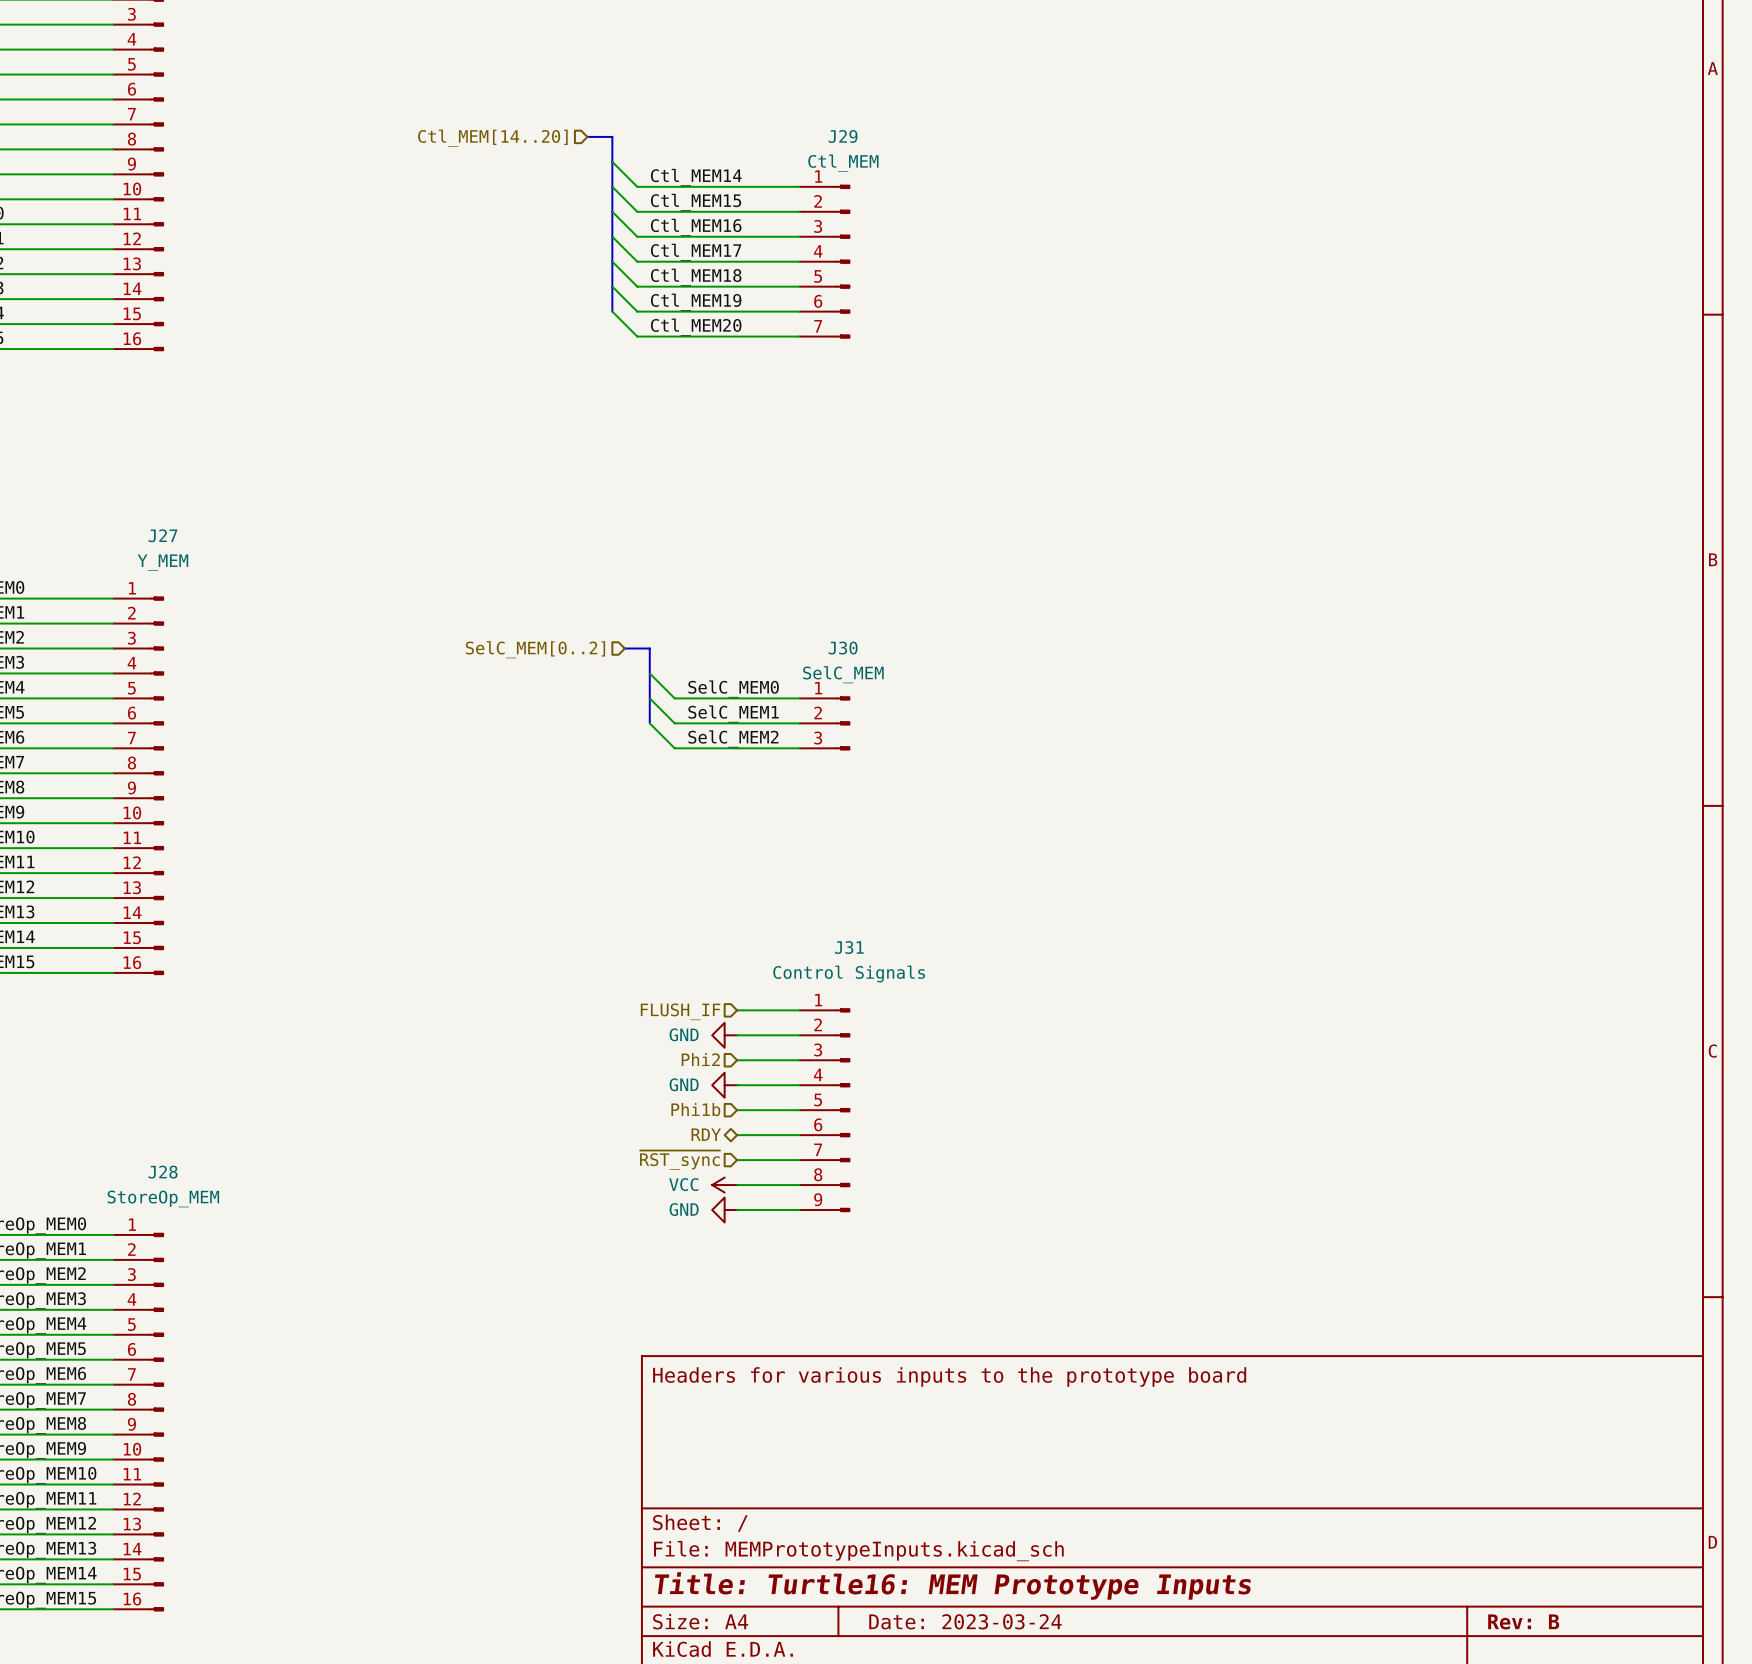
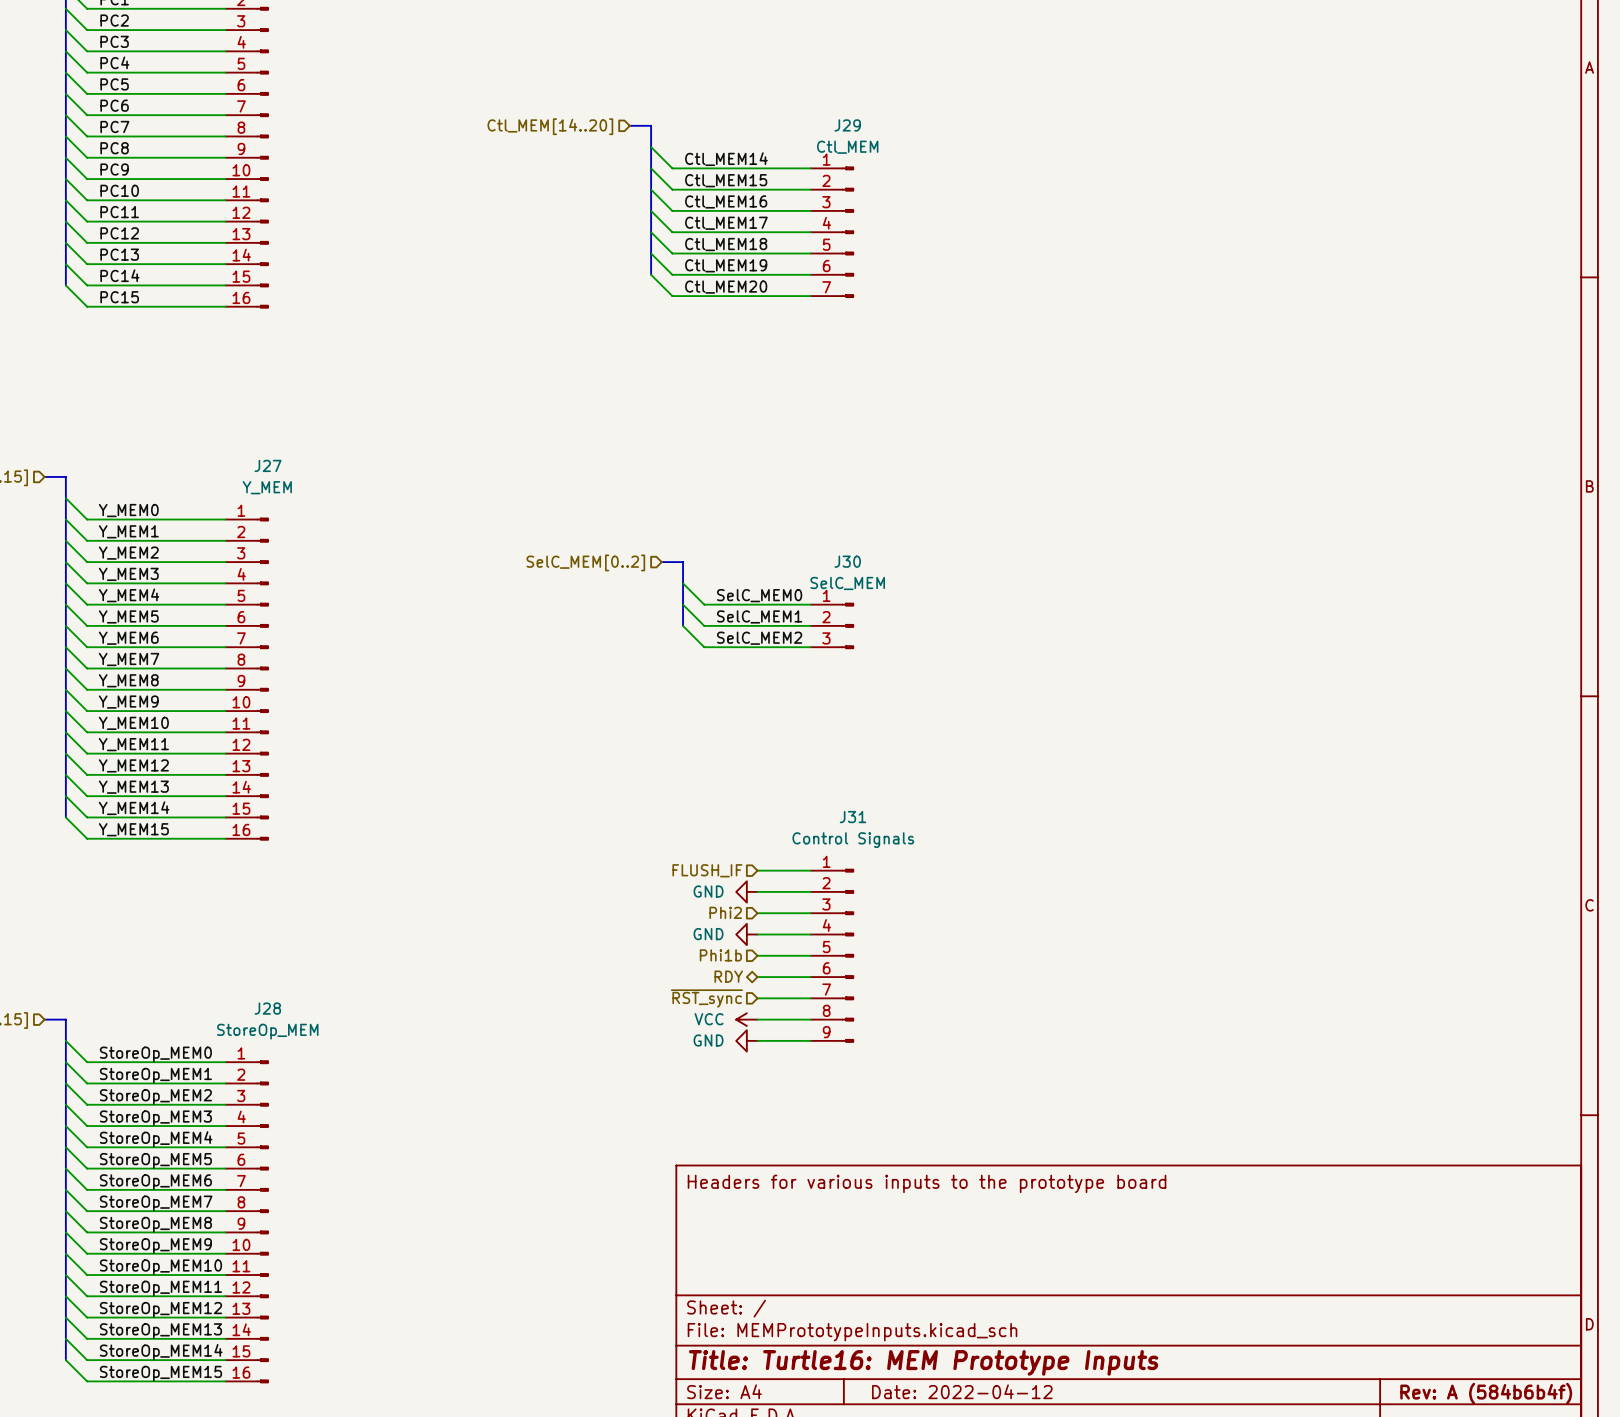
title block: Date: 2023-03-24 (965, 1621) -> Date: 2022-04-12 (962, 1391)
title block: Rev: B (1523, 1621) -> Rev: A (584b6b4f) (1486, 1393)

